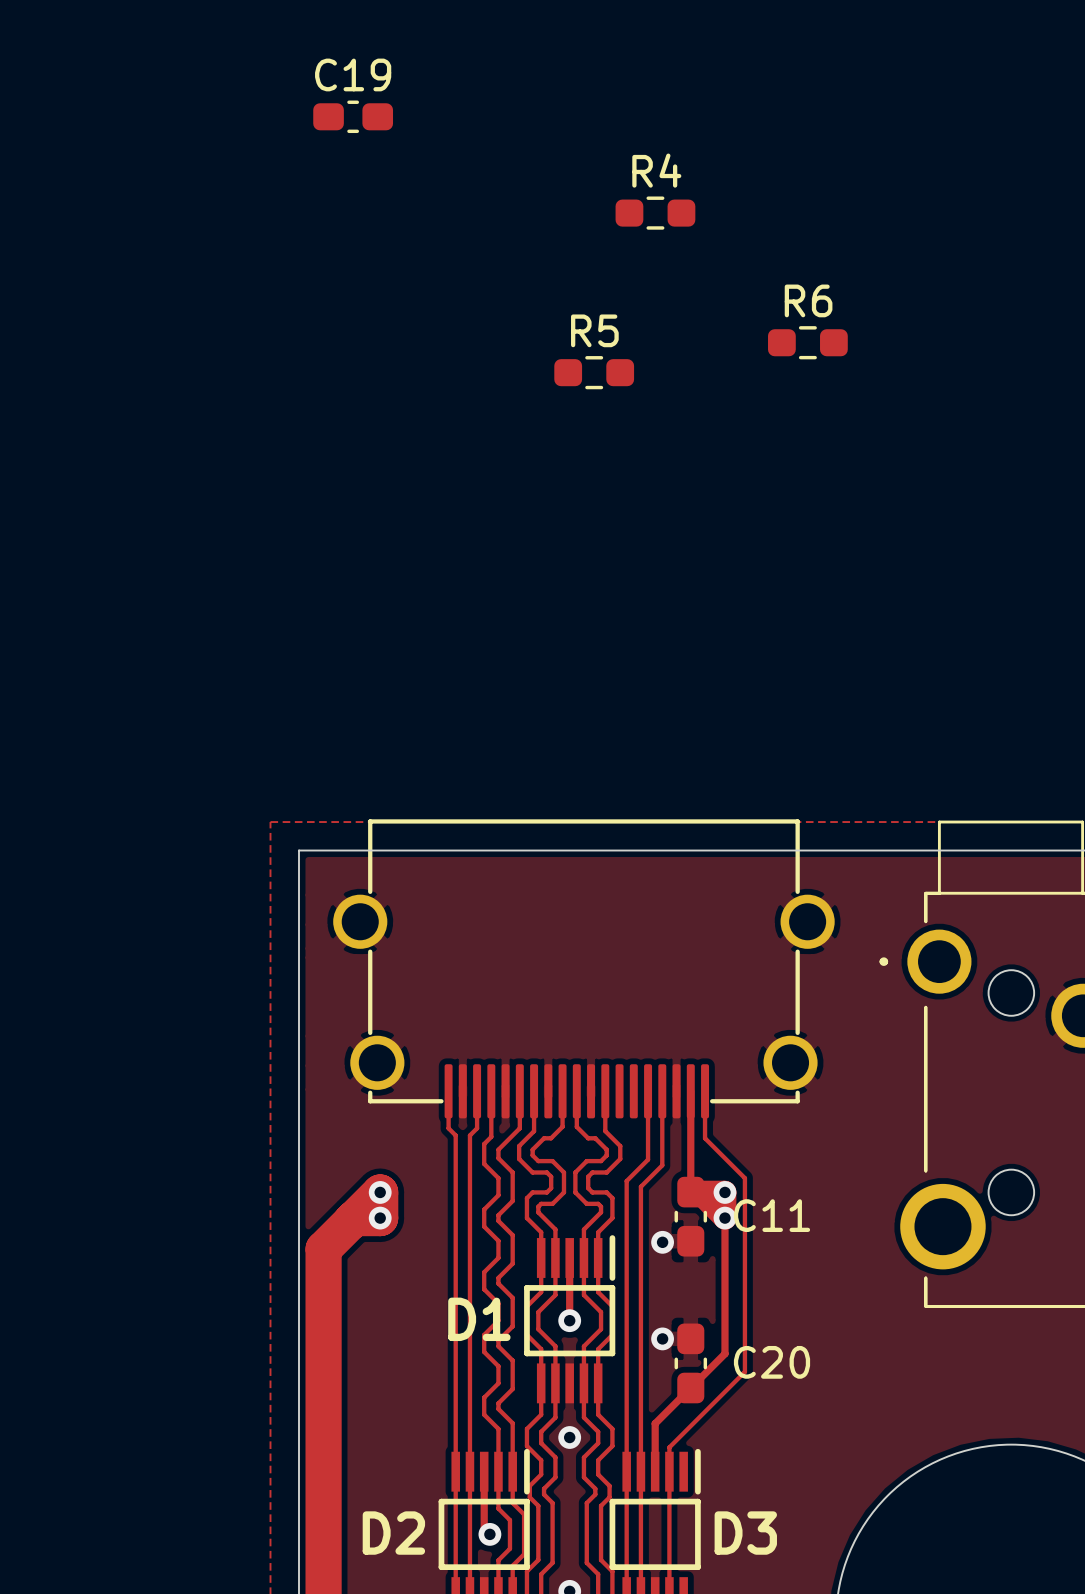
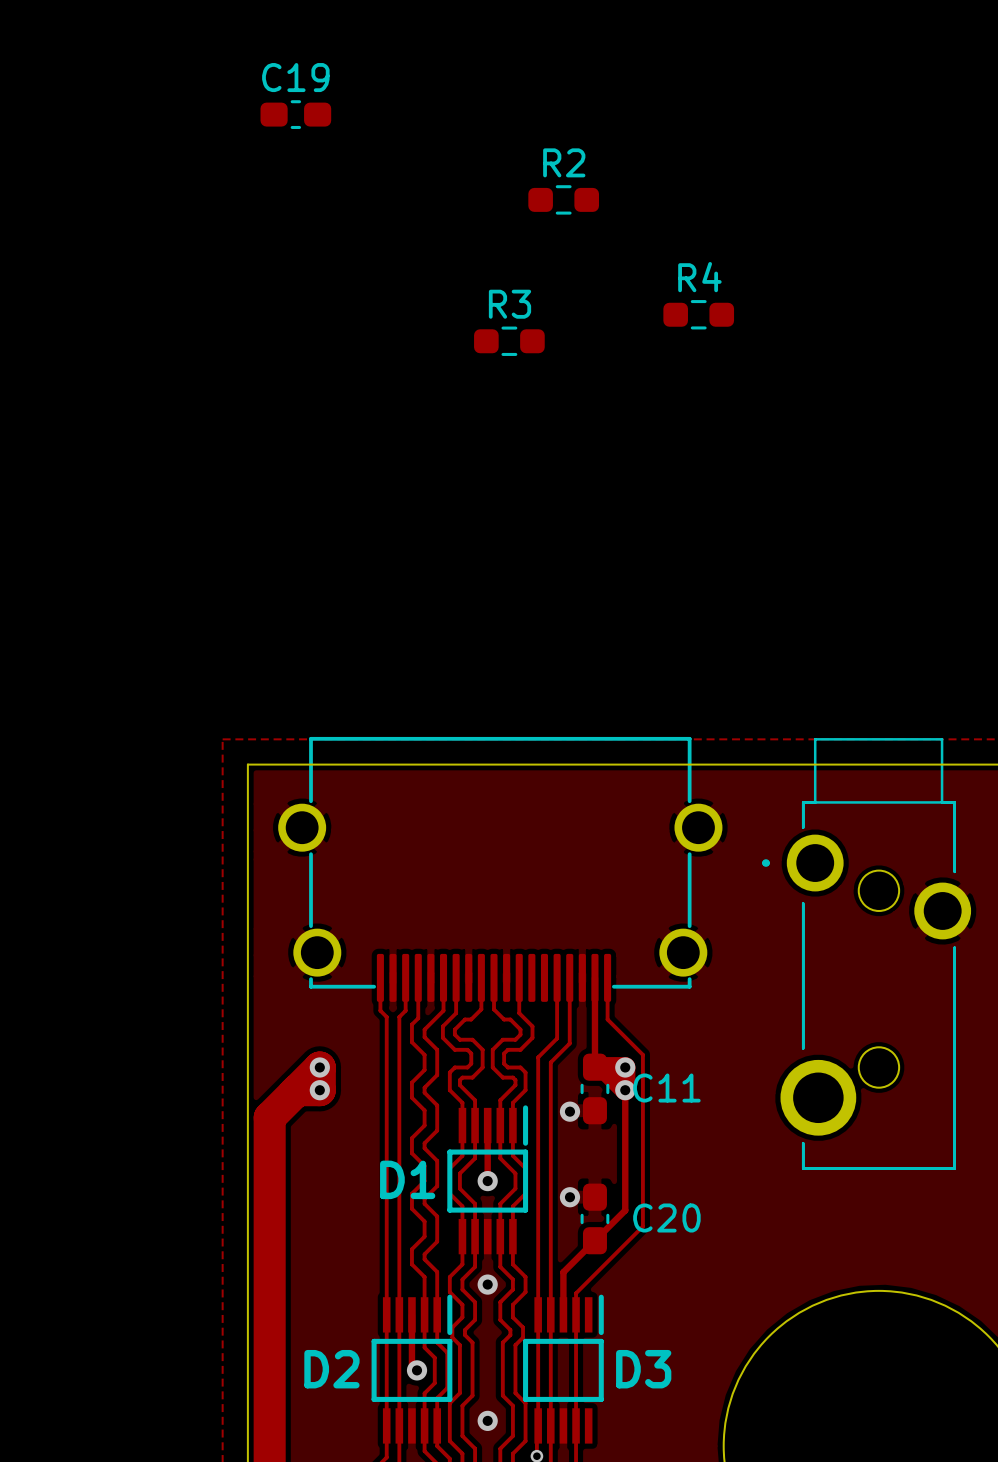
R4 name: R4 (656, 170) -> R2 (564, 162)
R6 name: R6 (808, 300) -> R4 (699, 277)
R5 name: R5 (594, 330) -> R3 (509, 304)

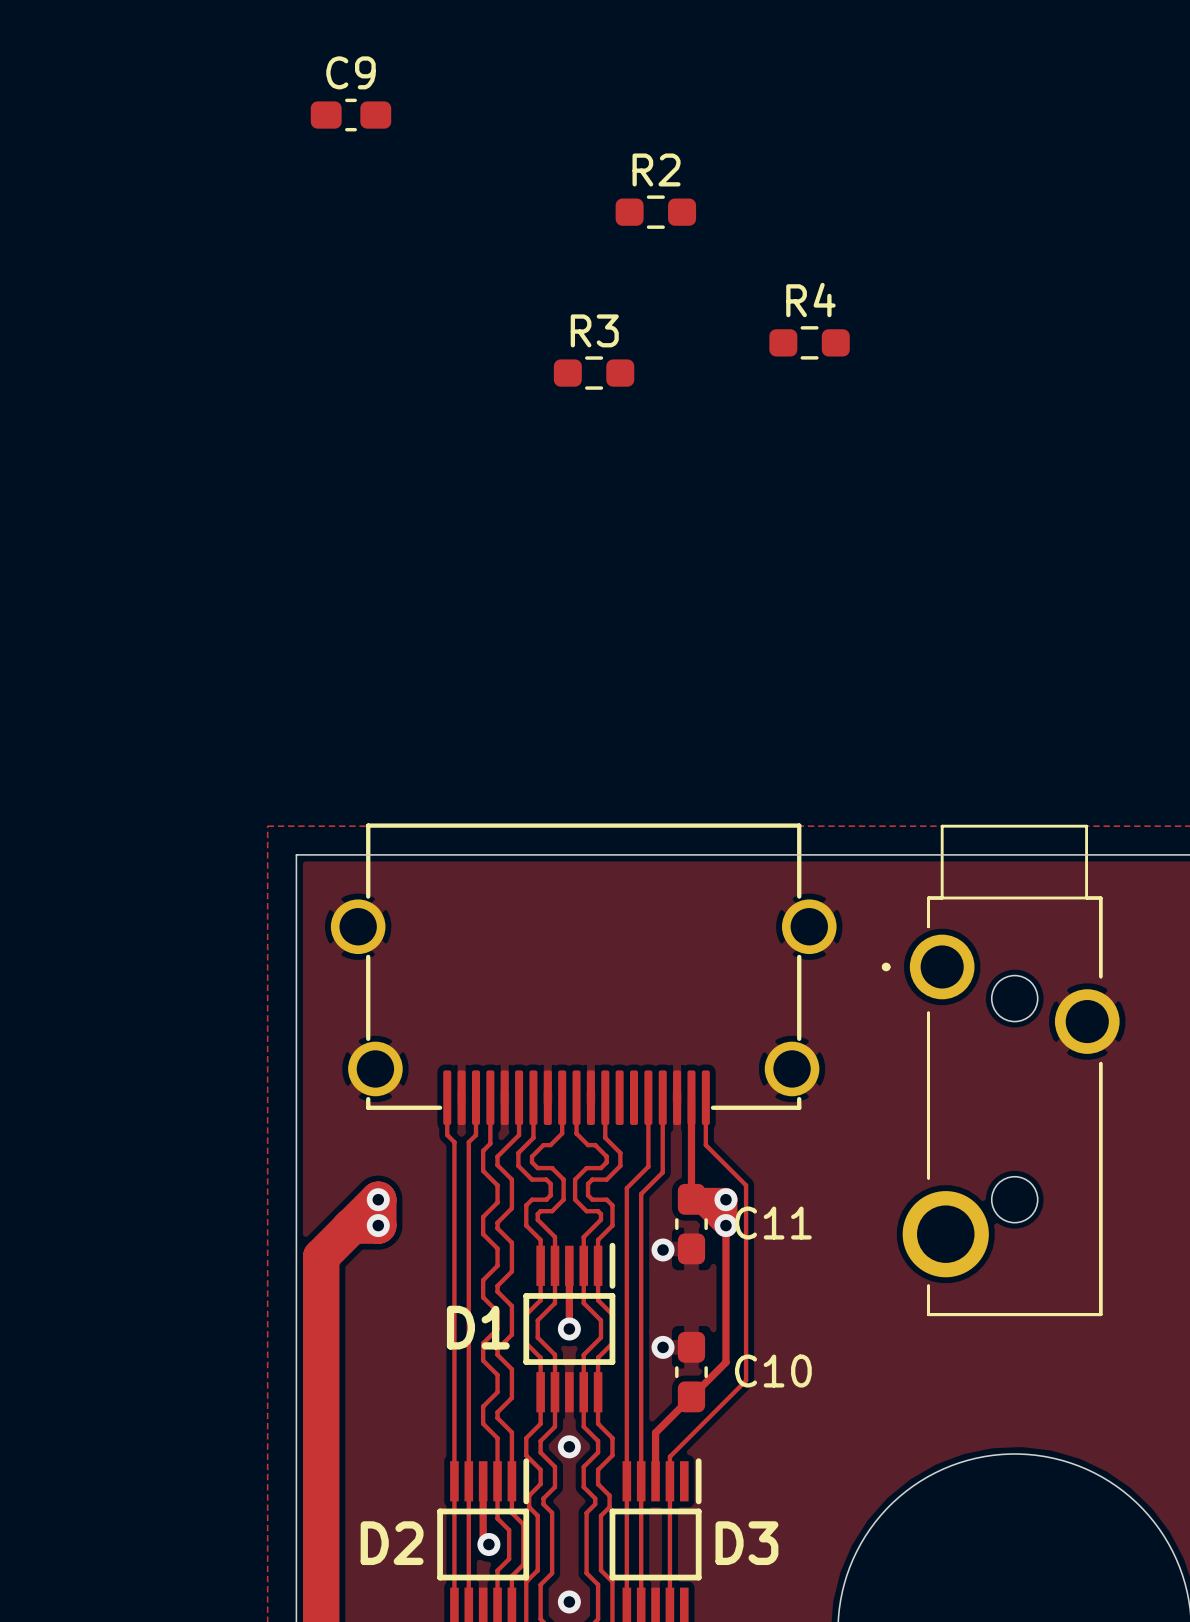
C19 name: C19 (295, 77) -> C9 (350, 72)
C20 name: C20 (666, 1218) -> C10 (773, 1371)

